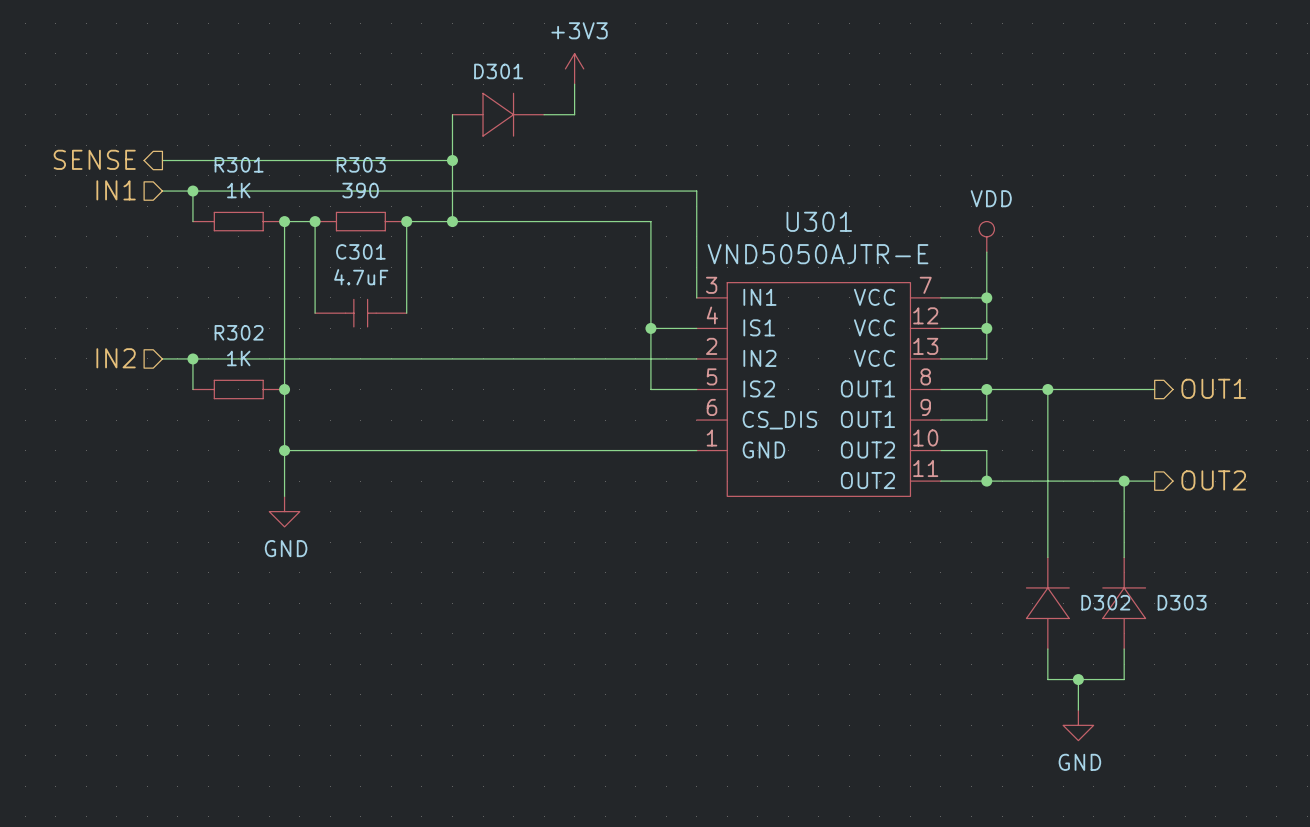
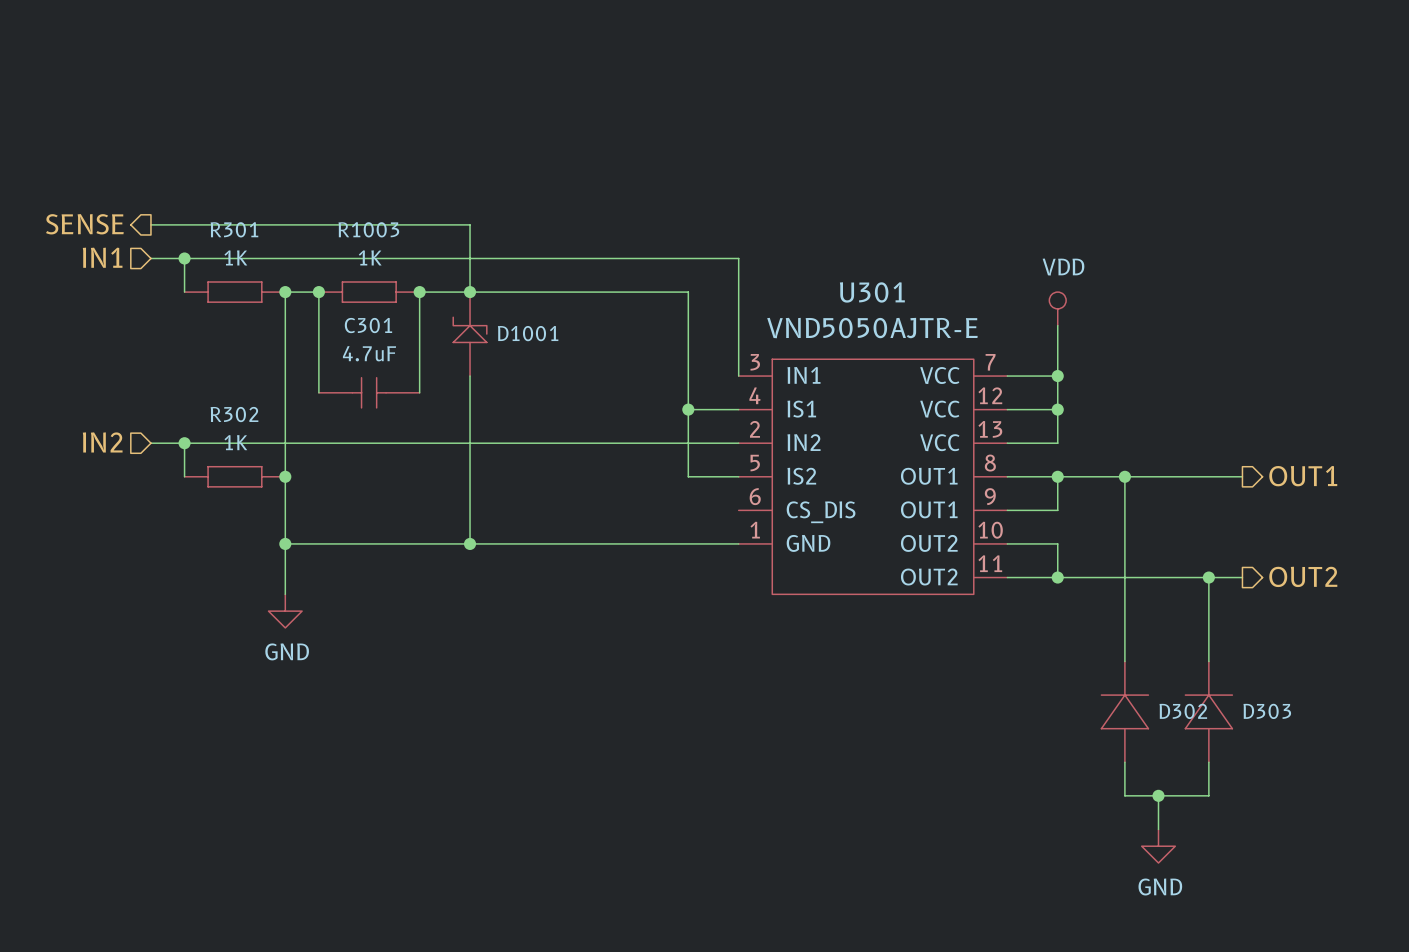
power symbol: +3V3 (574, 68) -> none
wire: (574, 84) (574, 114) (544, 114) -> none
wire: (452, 114) (452, 160) -> none
D301: (498, 114) -> none
junction: (452, 160) -> none
R303 name: R303 (361, 164) -> R1003 (368, 229)
R303 value: 390 (360, 190) -> 1K (370, 257)
D1001: none -> (470, 334)
wire: none -> (470, 376) (470, 543)
junction: none -> (470, 543)

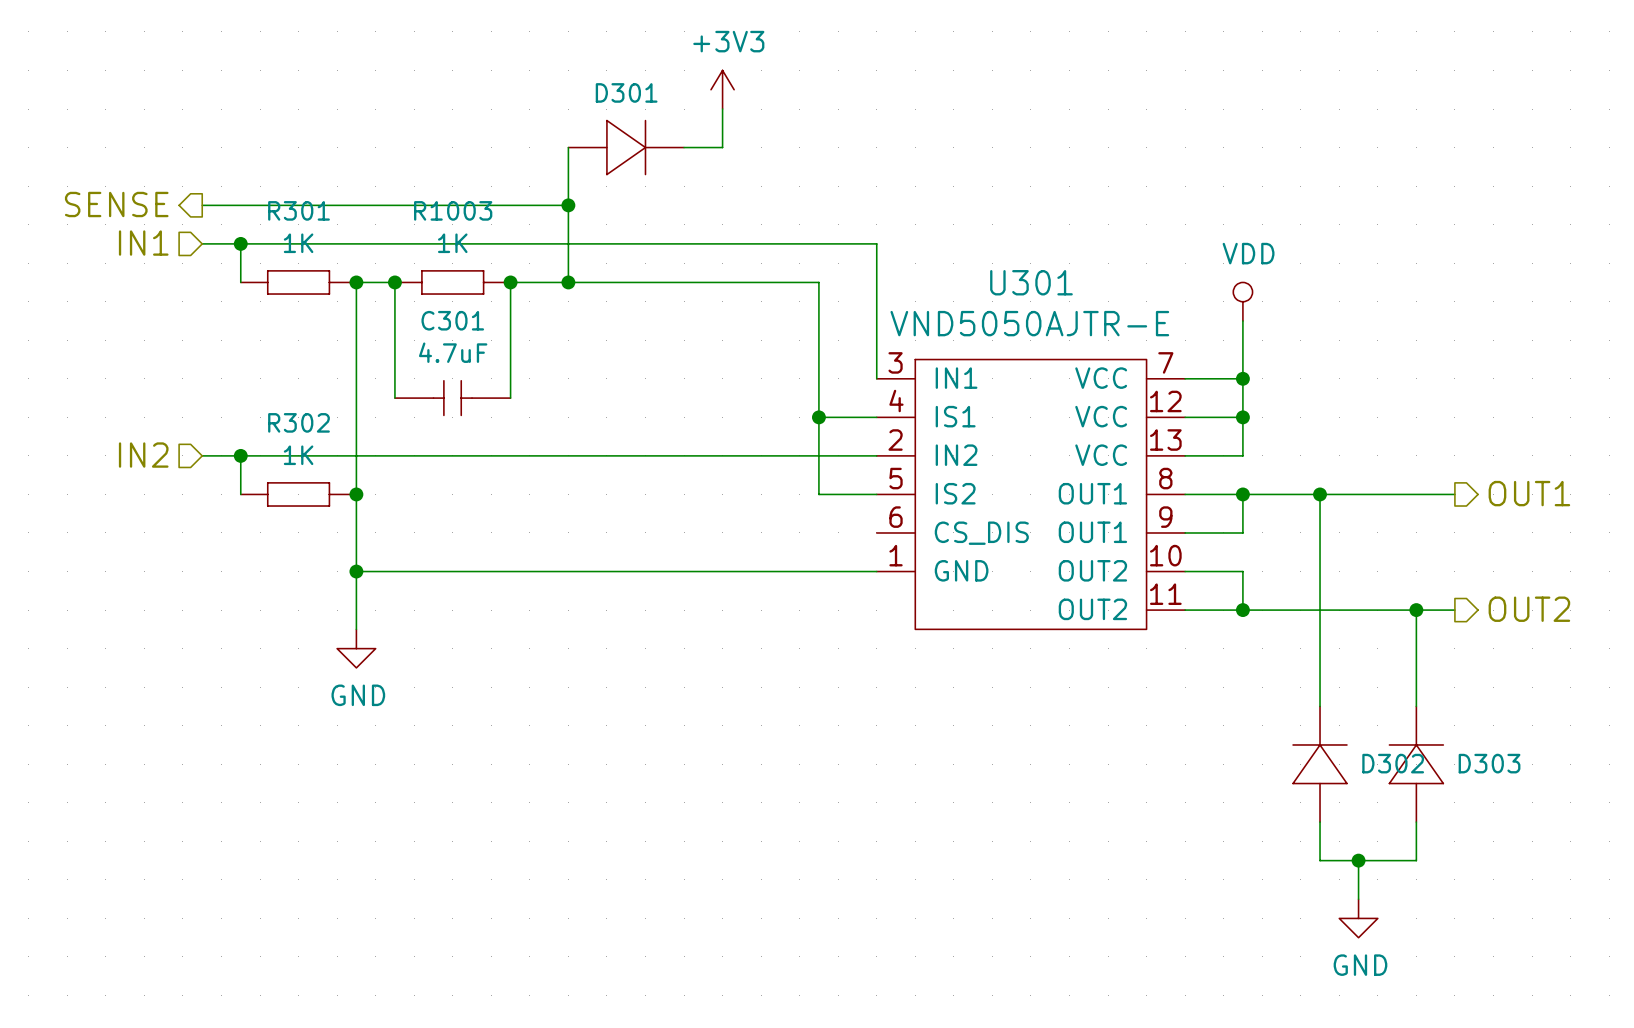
power symbol: none -> +3V3 (722, 89)
wire: none -> (722, 109) (722, 147) (684, 147)
wire: none -> (568, 147) (568, 205)
D301: none -> (626, 147)
junction: none -> (568, 205)
D1001: (470, 334) -> none
wire: (470, 376) (470, 543) -> none
junction: (470, 543) -> none

